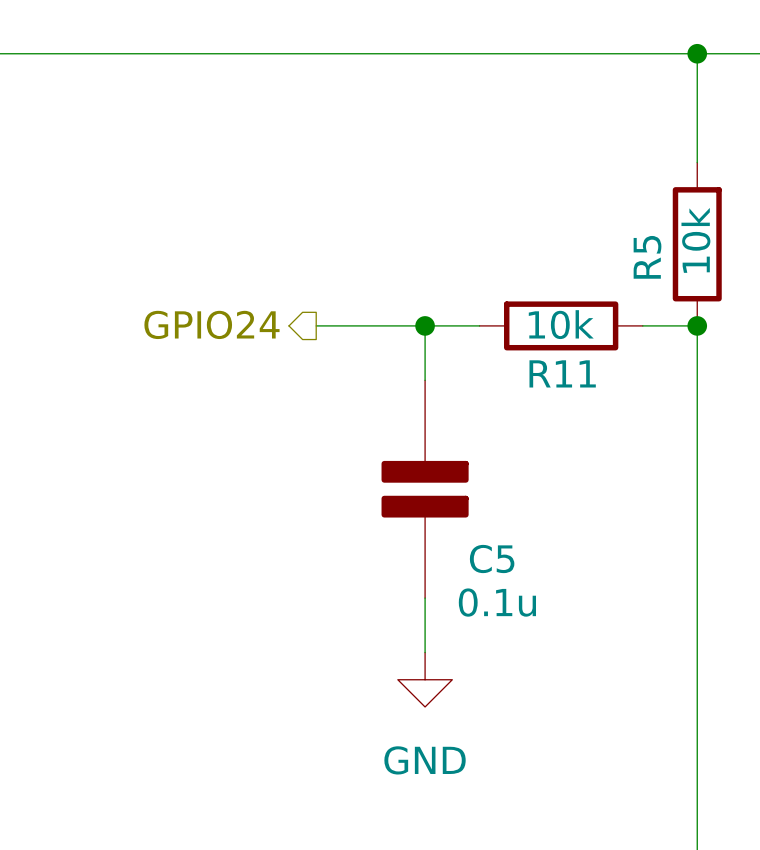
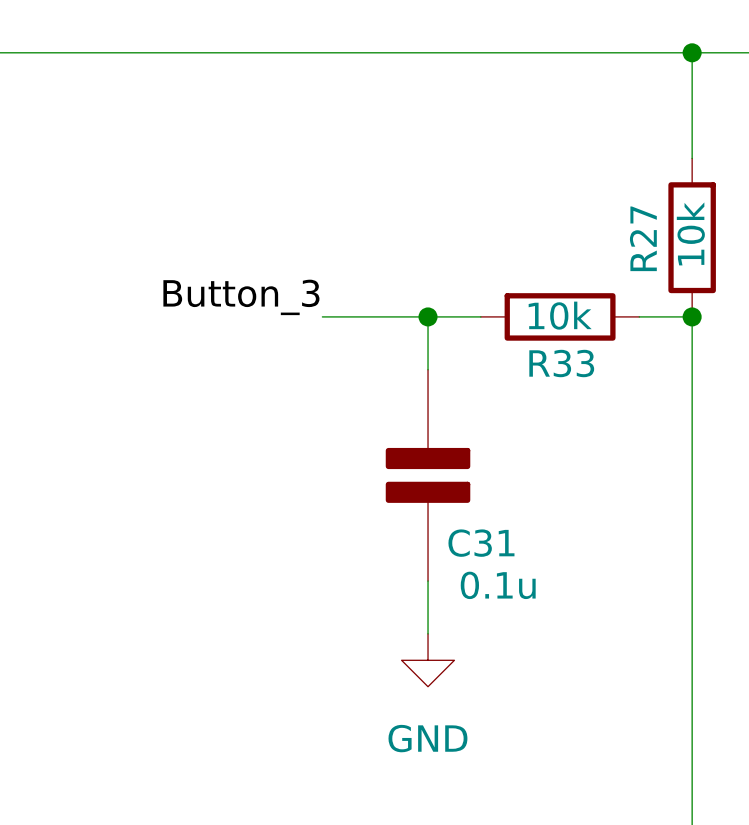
R5 name: R5 (647, 257) -> R27 (643, 238)
label: none -> Button_3 (241, 297)
hierarchical label: GPIO24 (211, 324) -> none
R11 name: R11 (562, 373) -> R33 (561, 363)
C5 name: C5 (492, 559) -> C31 (481, 543)

